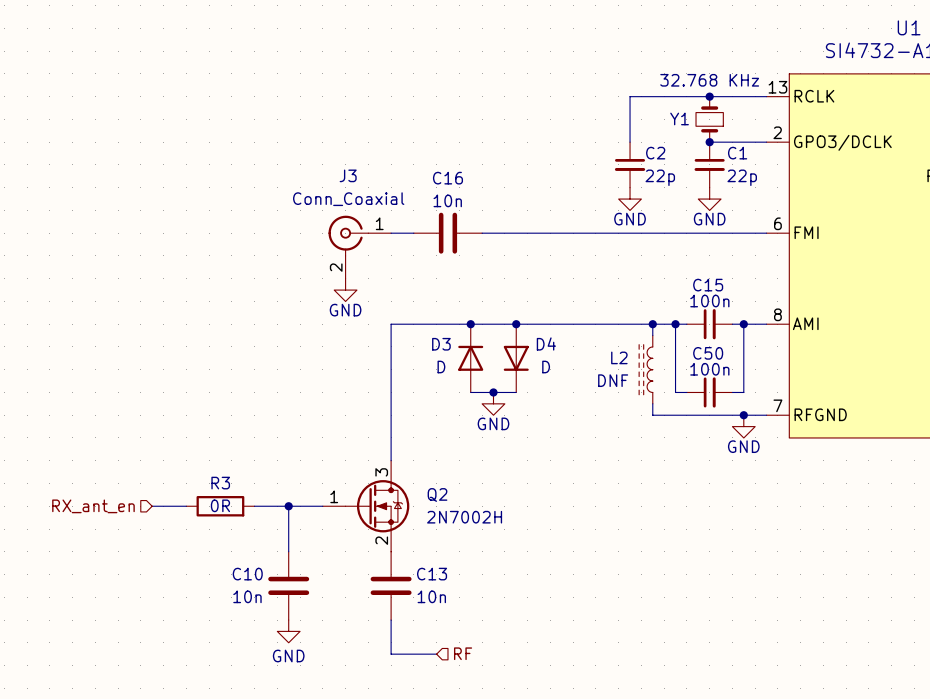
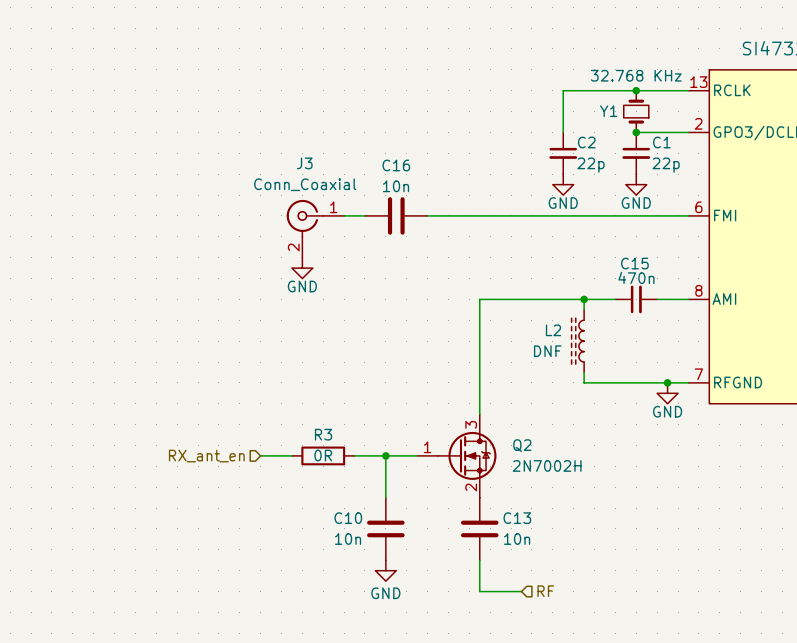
C15 value: 100n (709, 301) -> 470n (636, 277)
junction: (470, 324) -> none
junction: (516, 324) -> none
wire: (539, 324) (391, 324) (391, 460) -> (479, 299) (479, 414)
wire: (675, 324) (675, 392) (686, 392) -> none
junction: (675, 324) -> none
wire: (743, 324) (743, 392) (732, 392) -> none
junction: (743, 324) -> none
D3: D (470, 358) -> none
D4: D (516, 358) -> none
wire: (470, 392) (516, 392) -> none
junction: (493, 392) -> none
C50: 100n (709, 392) -> none
power symbol: GND (493, 403) -> none
junction: none -> (385, 455)
hierarchical label position: RX_ant_en (93, 506) -> RX_ant_en (206, 456)
wire: (152, 506) (186, 506) -> (260, 455) (291, 455)
R3 position: (220, 506) -> (323, 455)
wire: (254, 506) (322, 506) -> (354, 455) (417, 455)
wire: (288, 506) (288, 551) -> (385, 455) (385, 497)
junction: (288, 506) -> none
Q2 position: (366, 506) -> (456, 455)
C10 position: (288, 585) -> (385, 528)
C13 position: (391, 585) -> (479, 528)
wire: (391, 620) (391, 654) (436, 654) -> (479, 560) (479, 591) (521, 591)
power symbol: none -> GND (385, 570)
power symbol: GND (288, 631) -> none
hierarchical label position: RF (463, 653) -> RF (545, 591)

